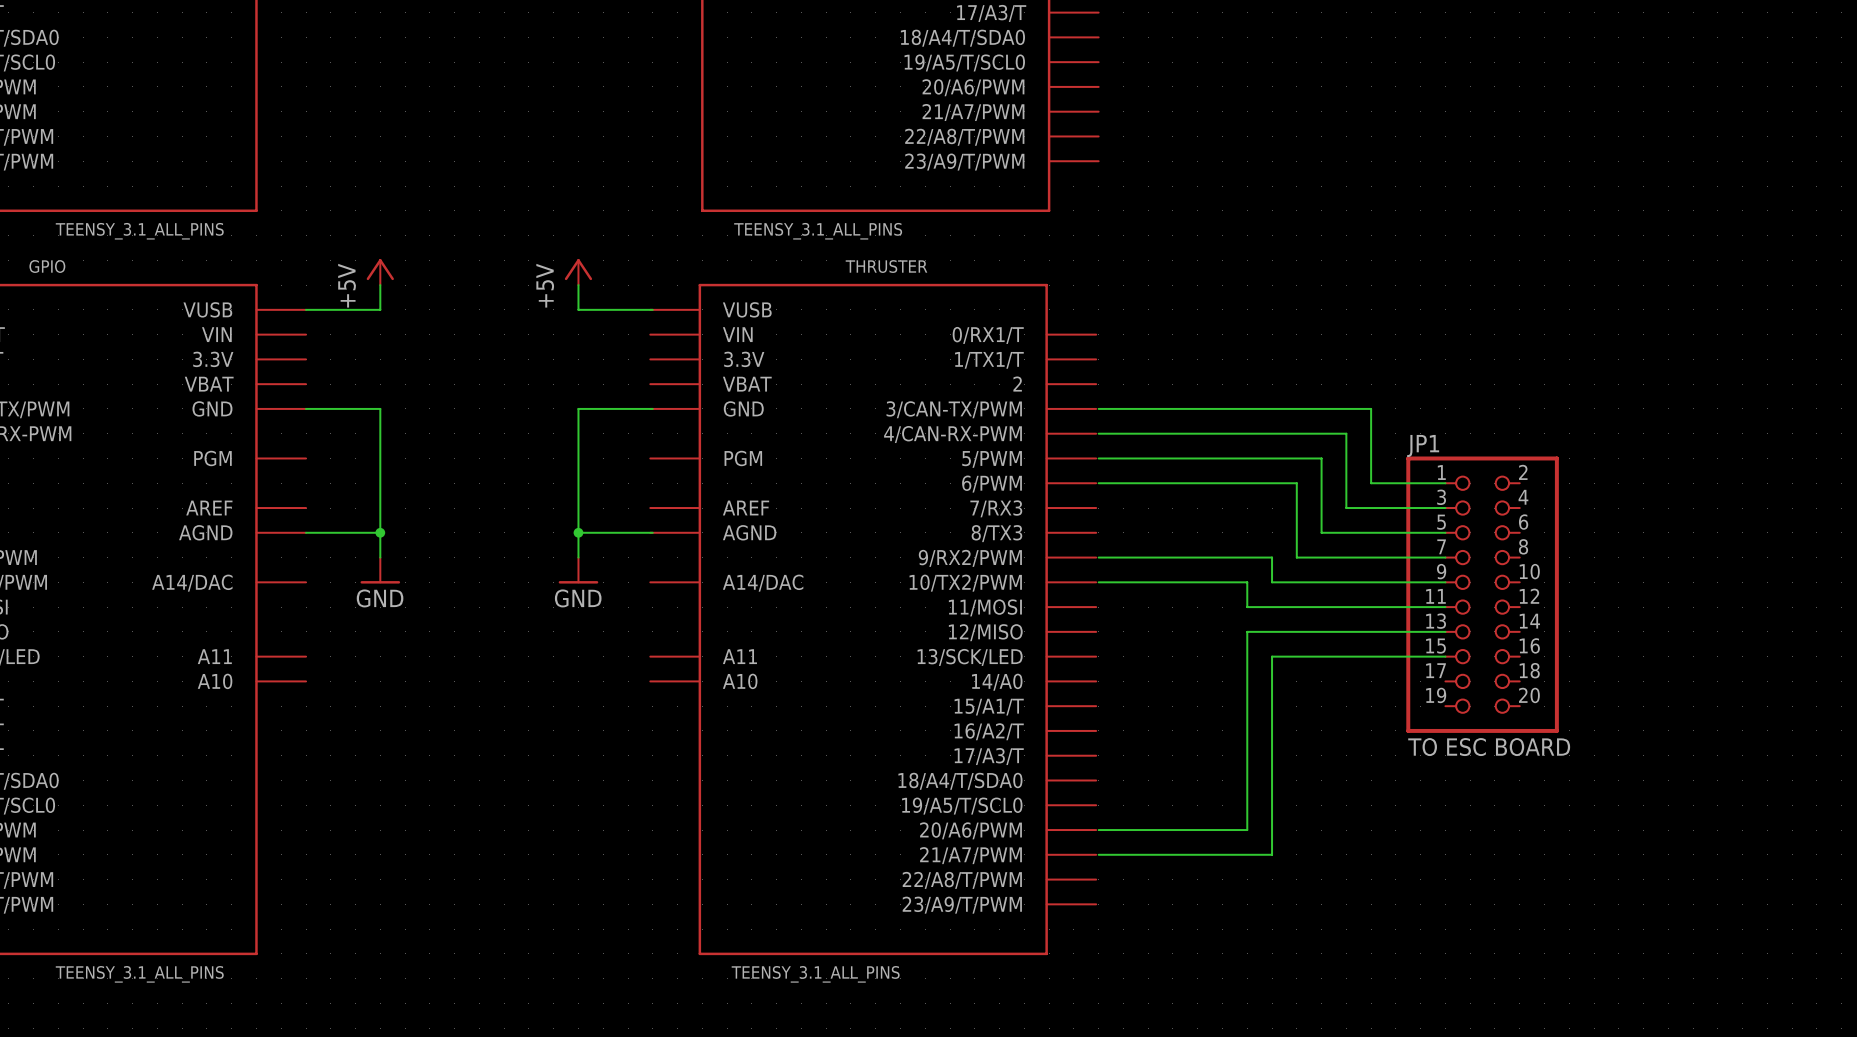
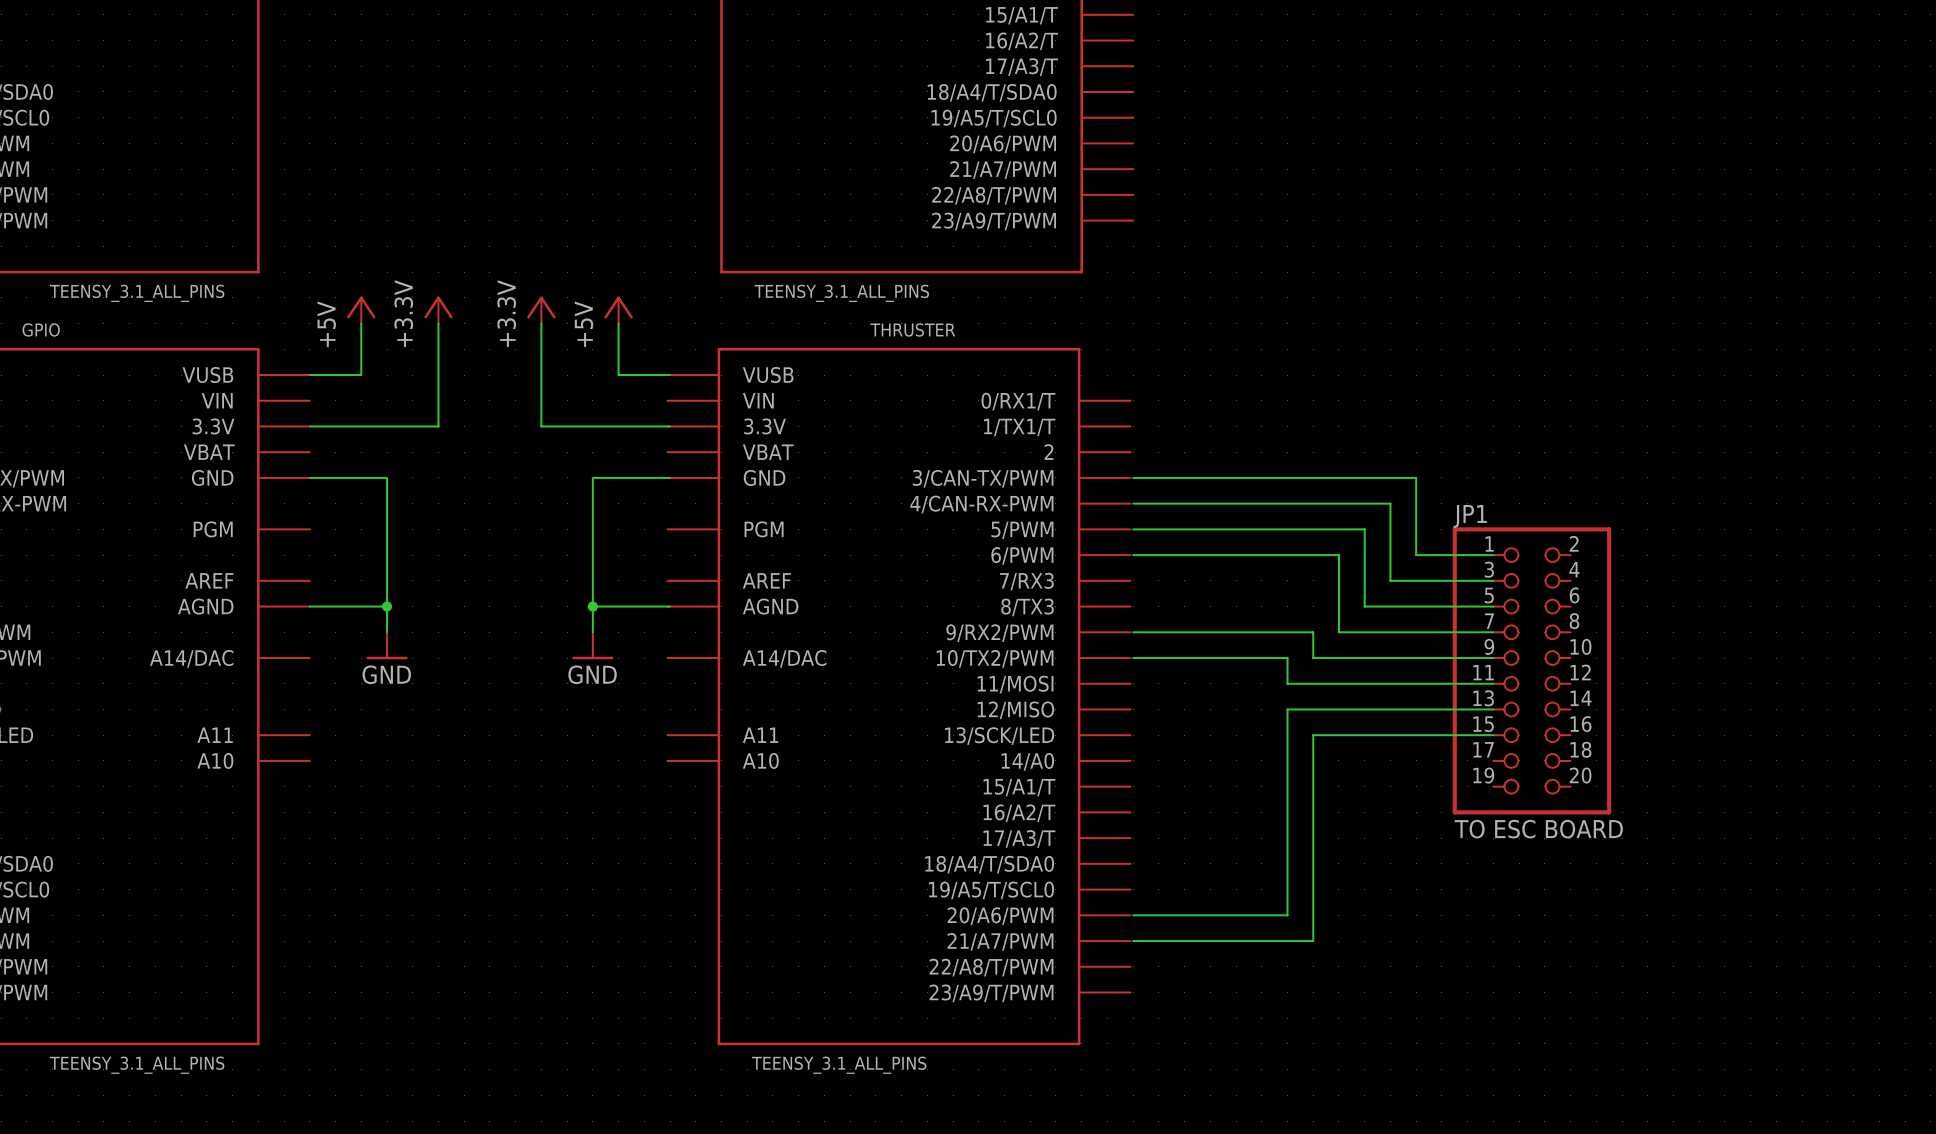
power symbol: none -> +3.3V (438, 310)
power symbol: none -> +3.3V (541, 310)
wire: none -> (438, 323) (438, 426) (309, 426)
wire: none -> (541, 323) (541, 426) (670, 426)
power symbol position: +5V (380, 272) -> +5V (361, 310)
power symbol position: +5V (578, 272) -> +5V (618, 310)
wire: (380, 285) (380, 309) (355, 309) -> (361, 323) (361, 375)
wire: (578, 285) (578, 309) (603, 309) -> (618, 323) (618, 375)

